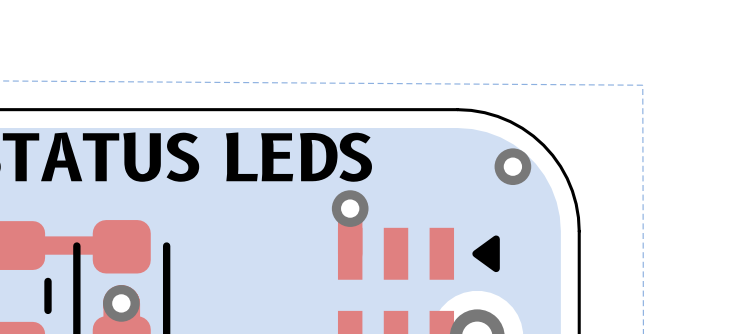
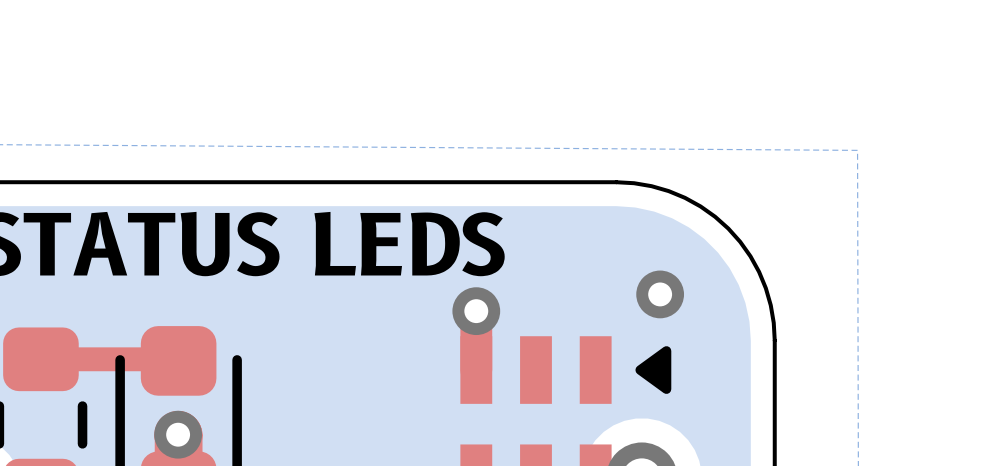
via position: (512, 166) -> (660, 294)

